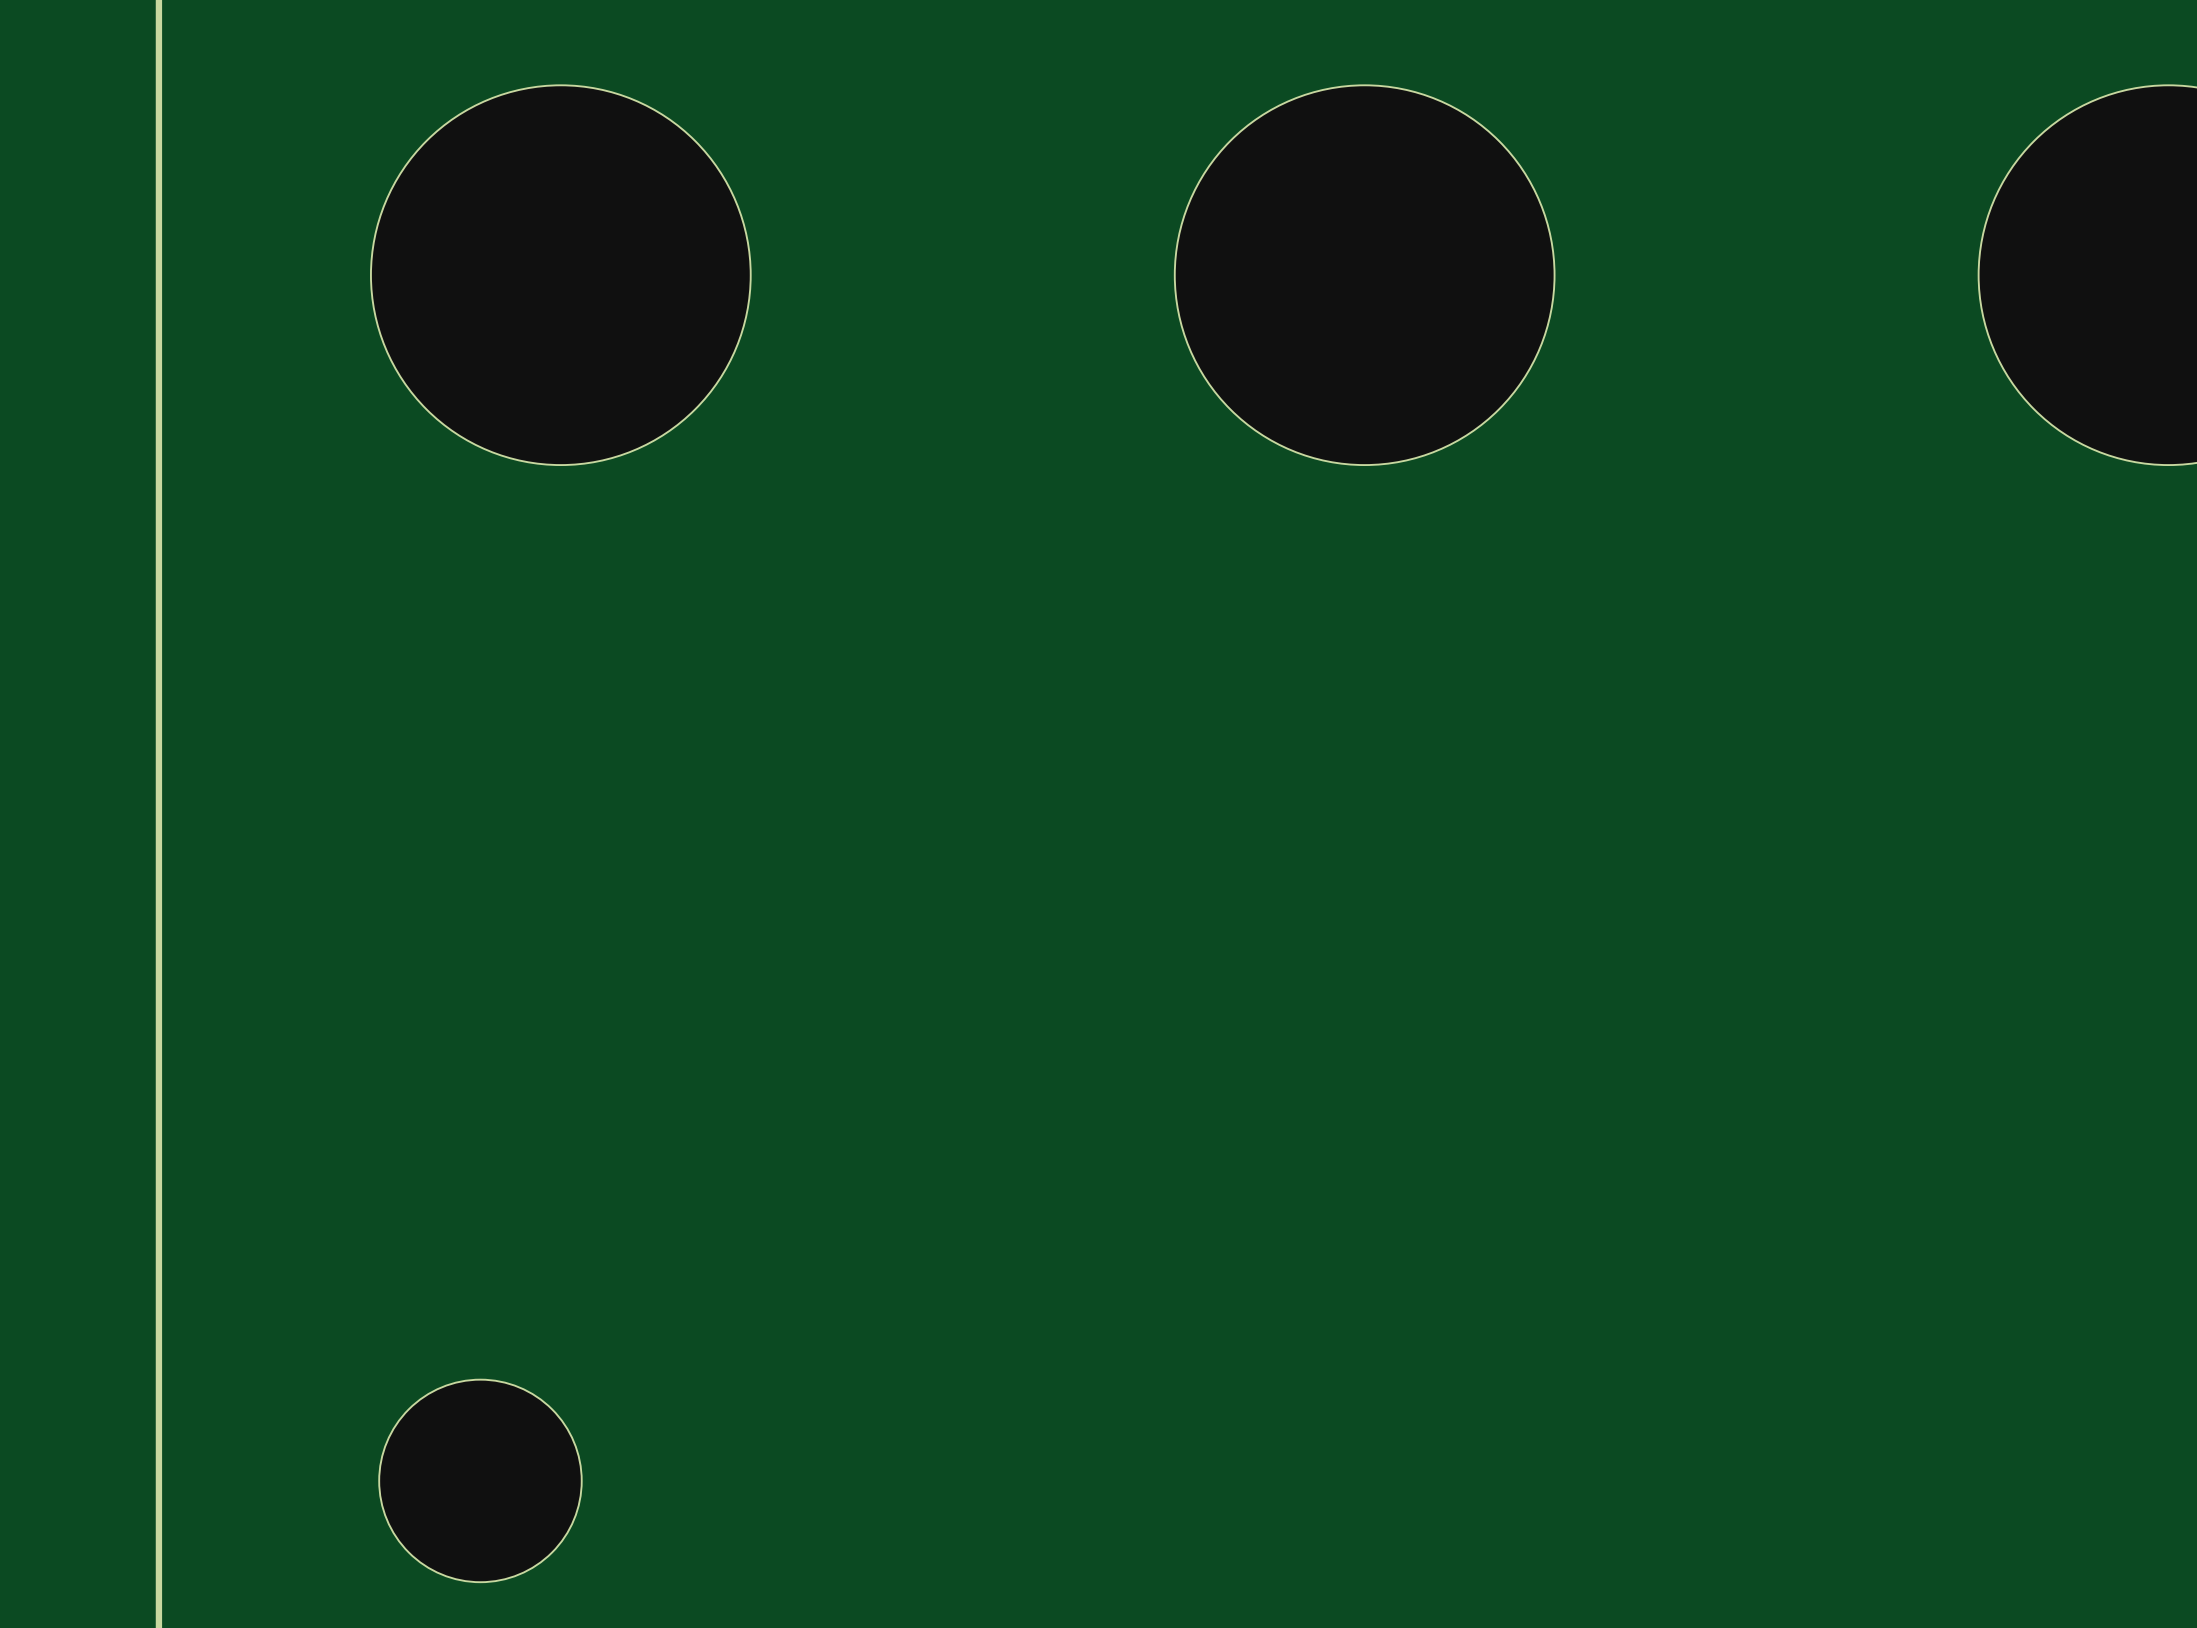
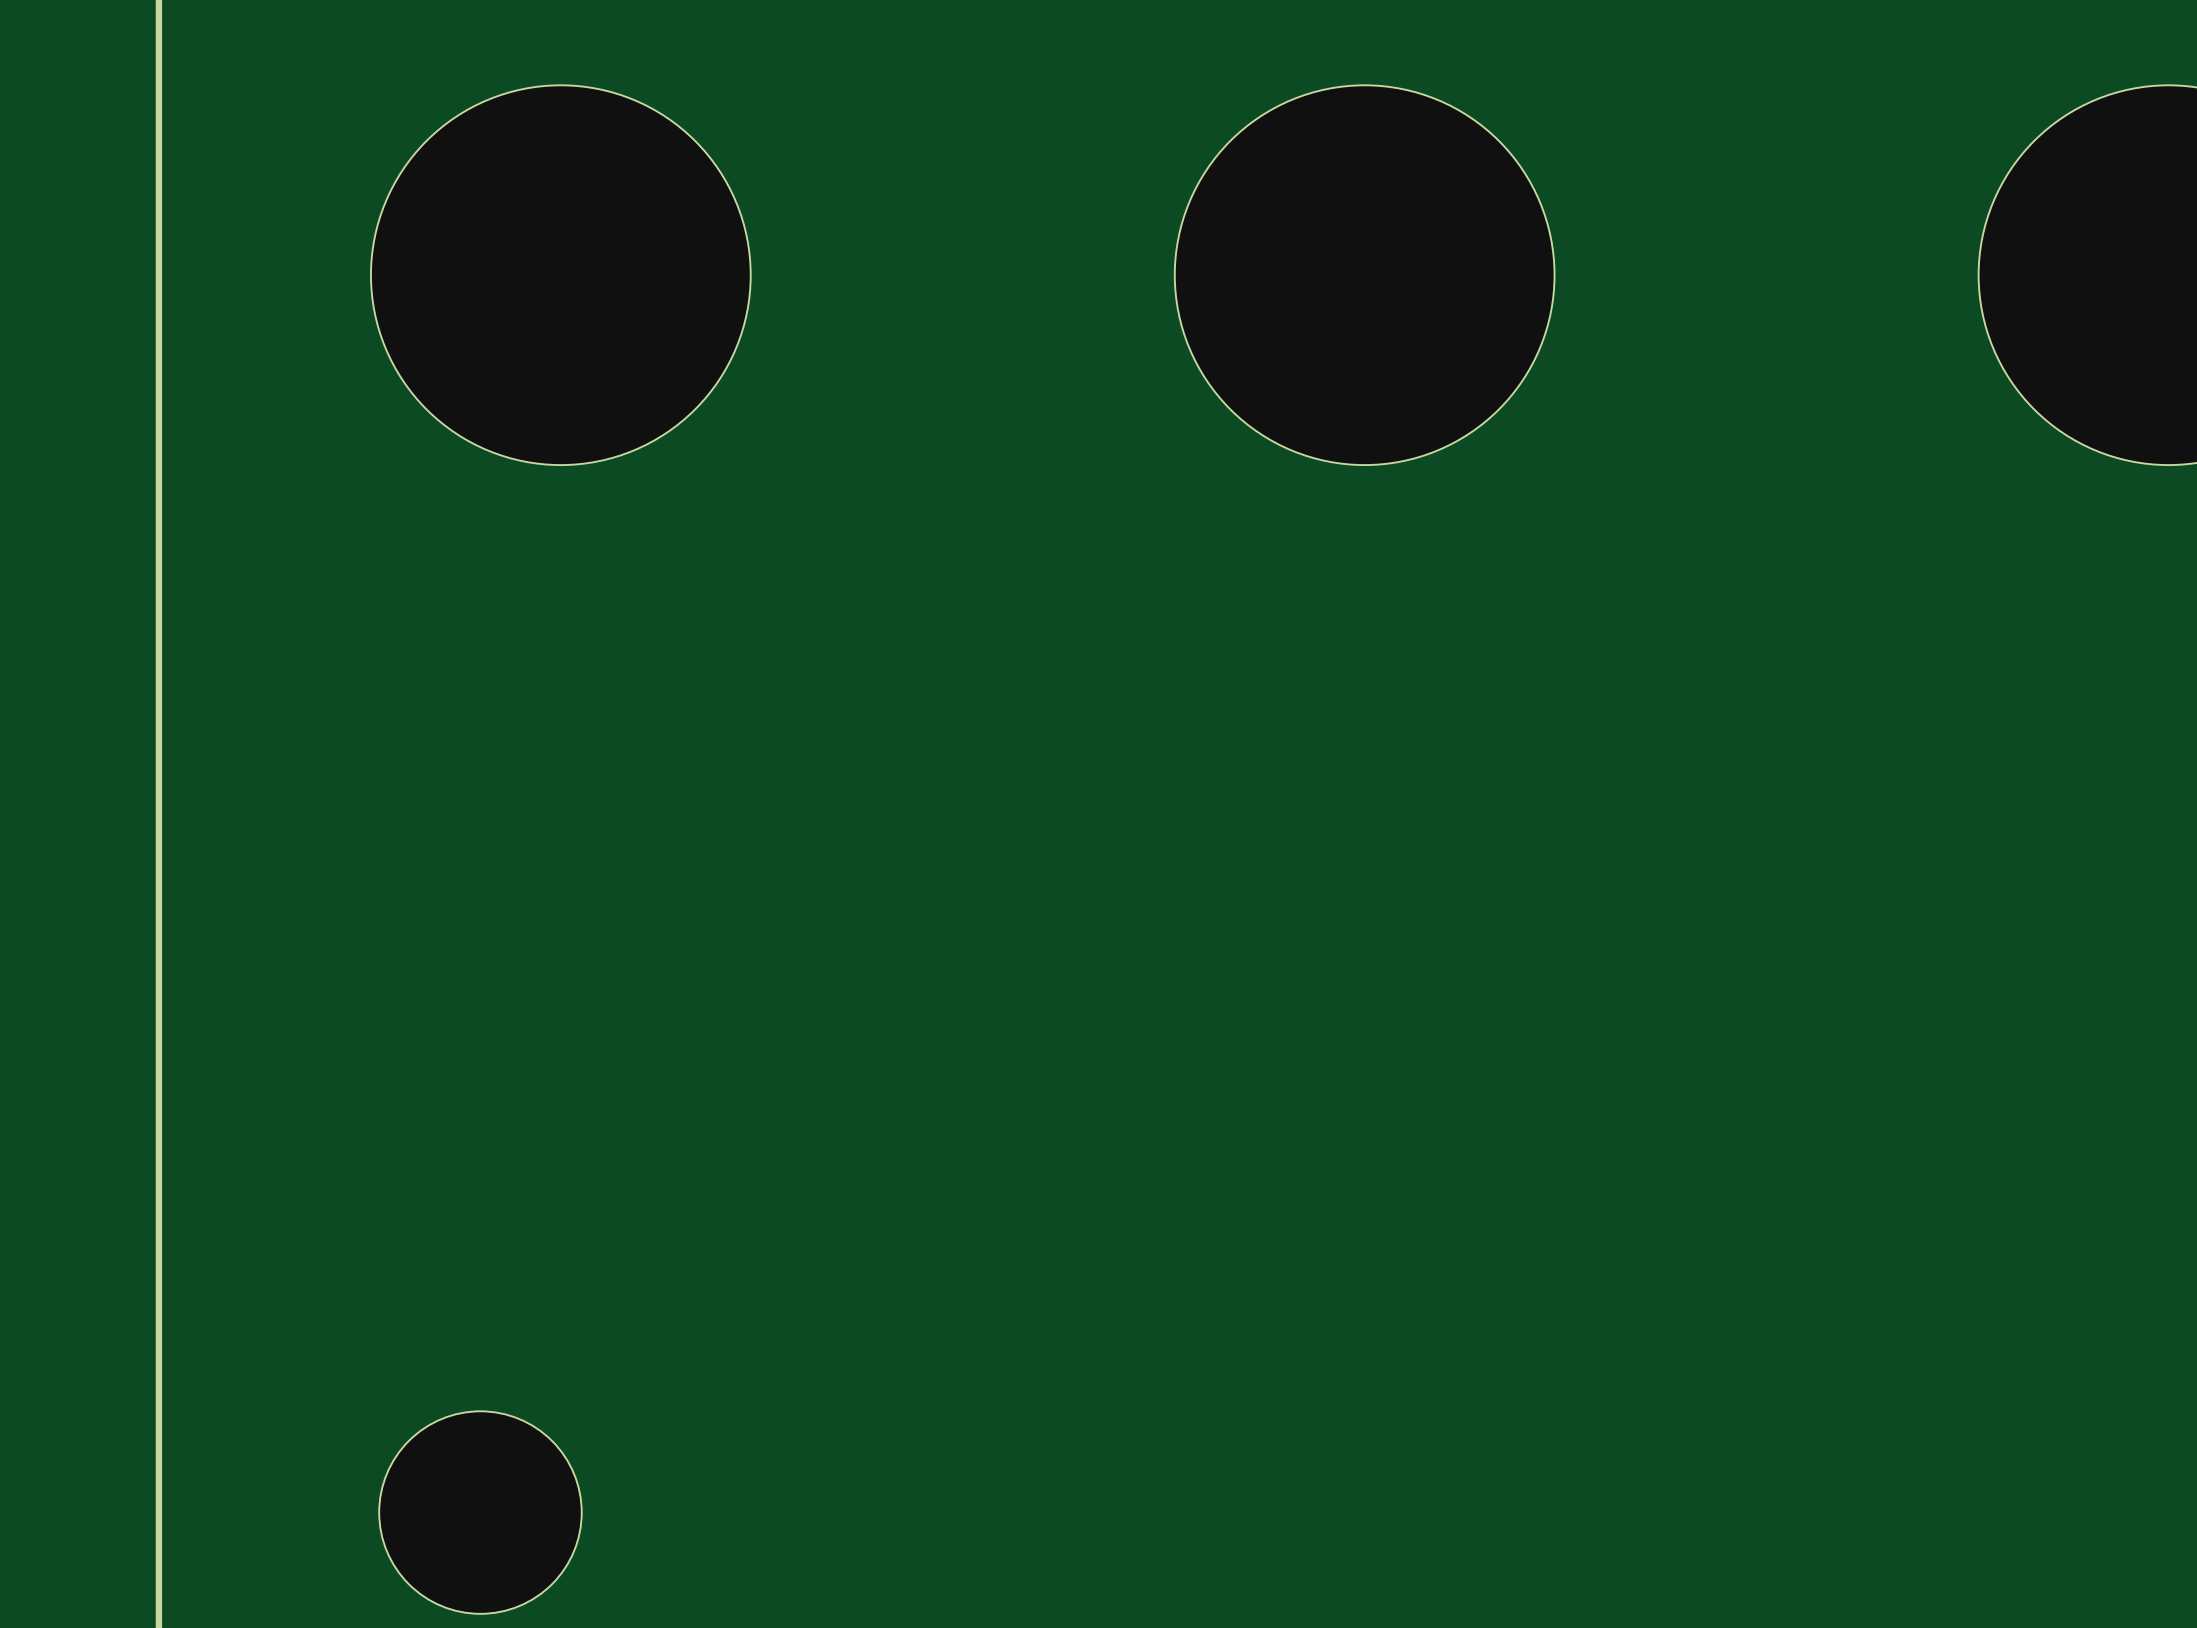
part position: (480, 1480) -> (480, 1512)

